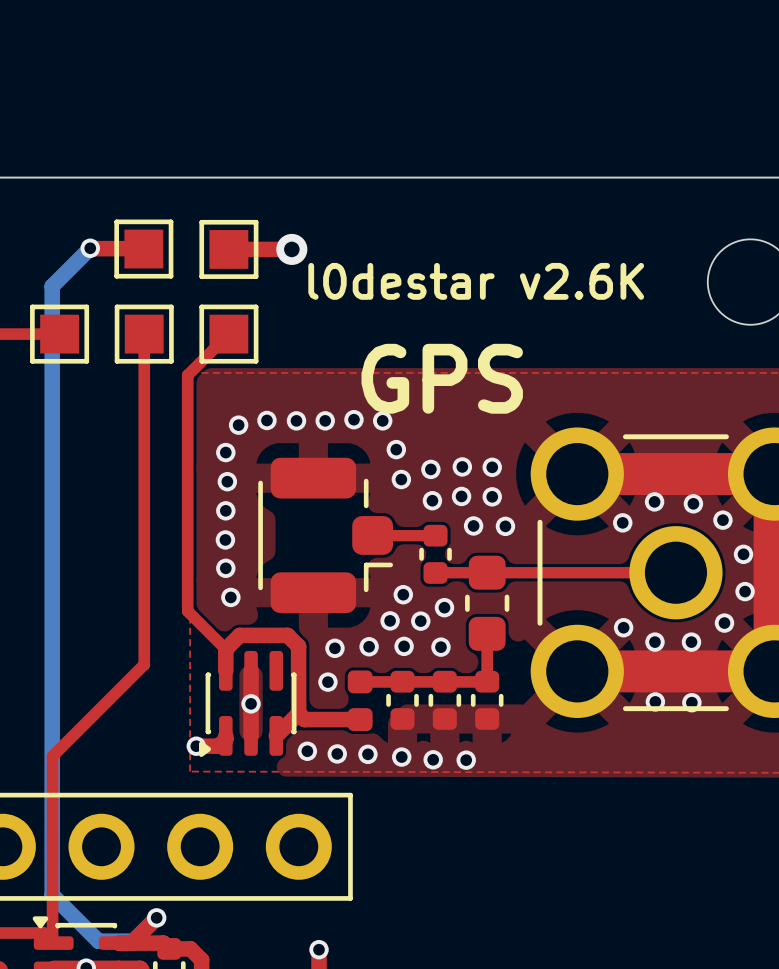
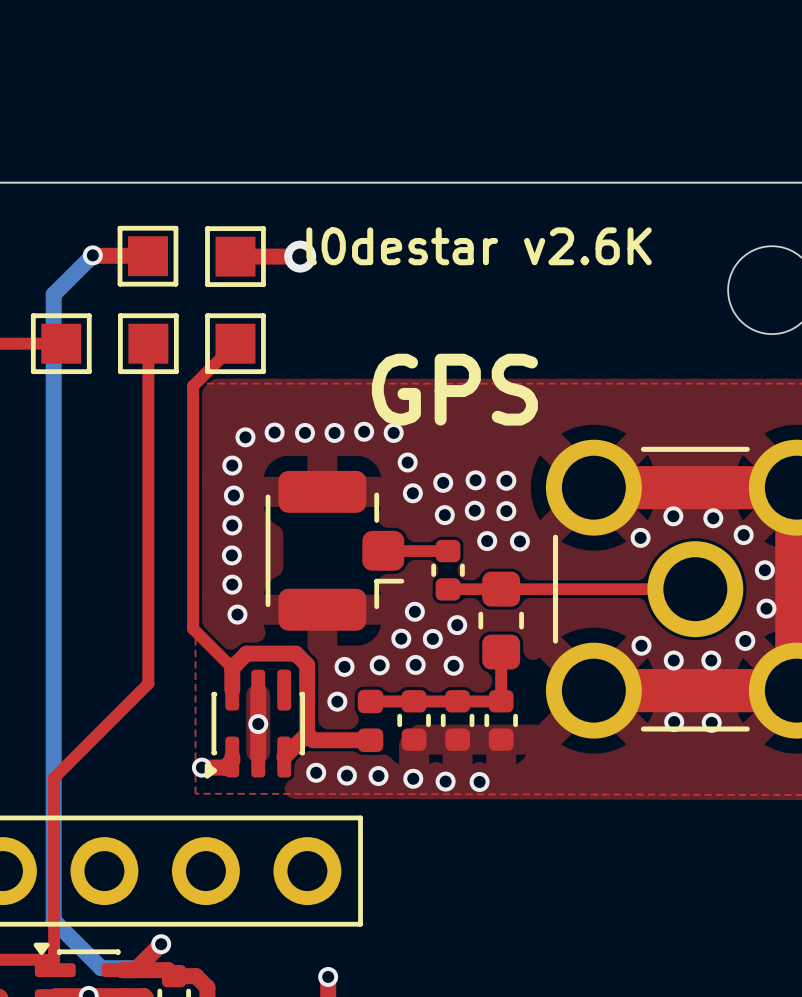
text position: l0destar v2.6K (476, 281) -> l0destar v2.6K (479, 246)

